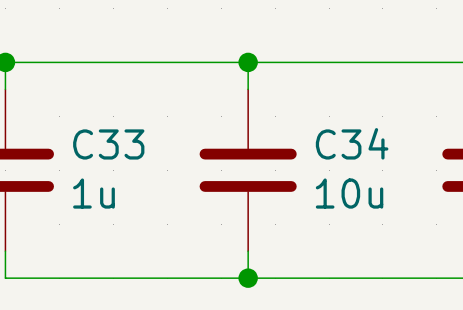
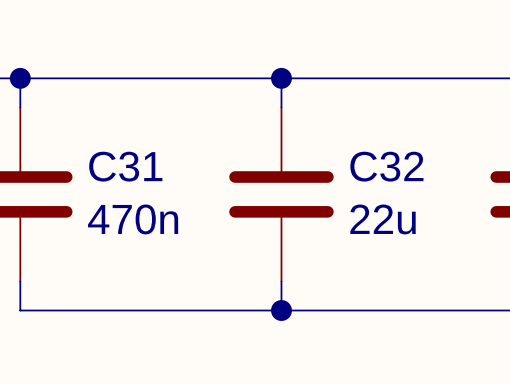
C34 name: C34 (352, 143) -> C32 (386, 166)
C33 name: C33 (108, 144) -> C31 (125, 166)
C33 value: 1u (93, 193) -> 470n (133, 219)
C34 value: 10u (349, 193) -> 22u (383, 219)

